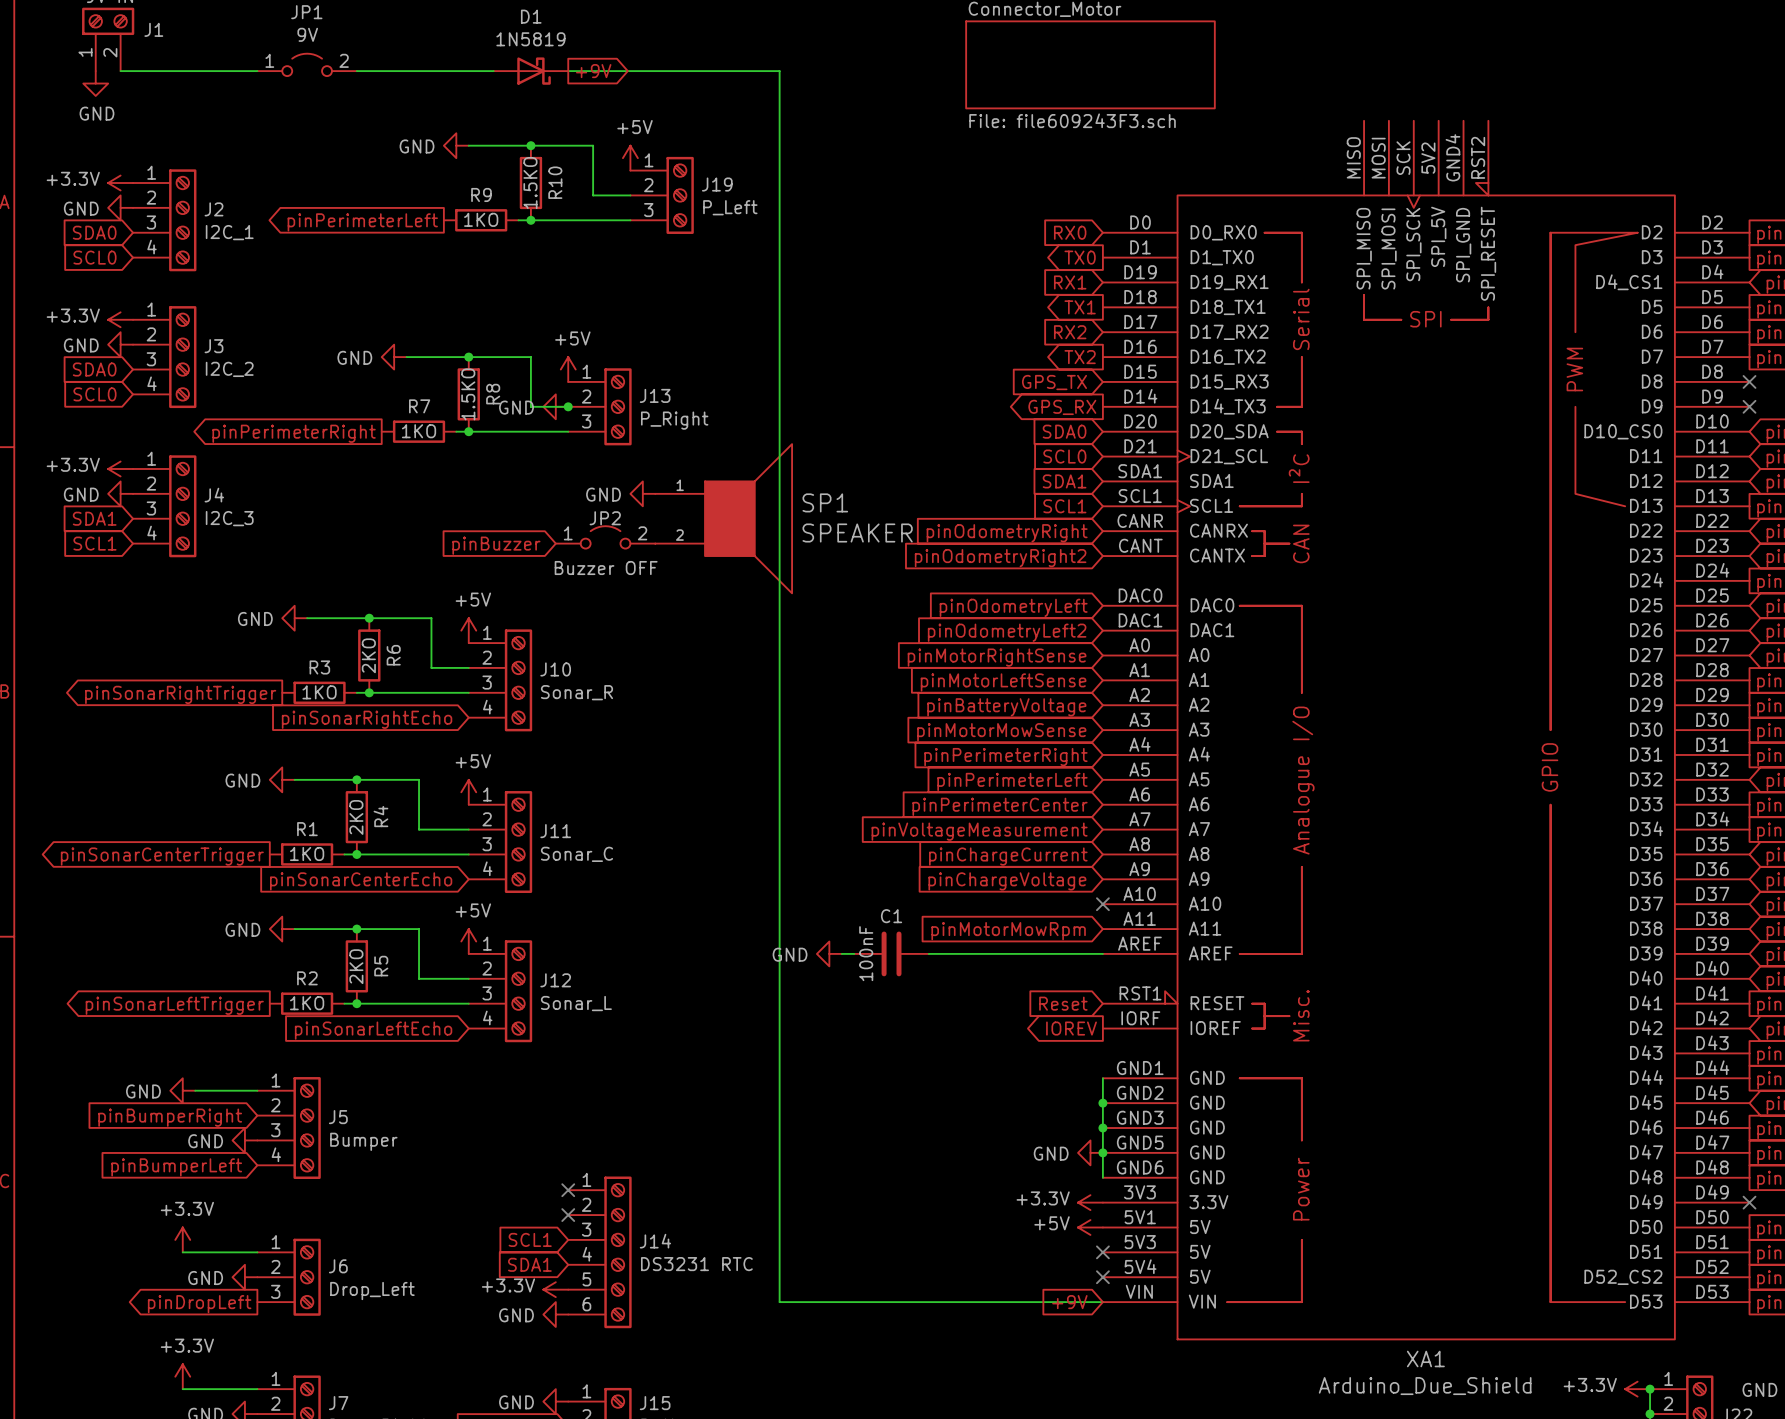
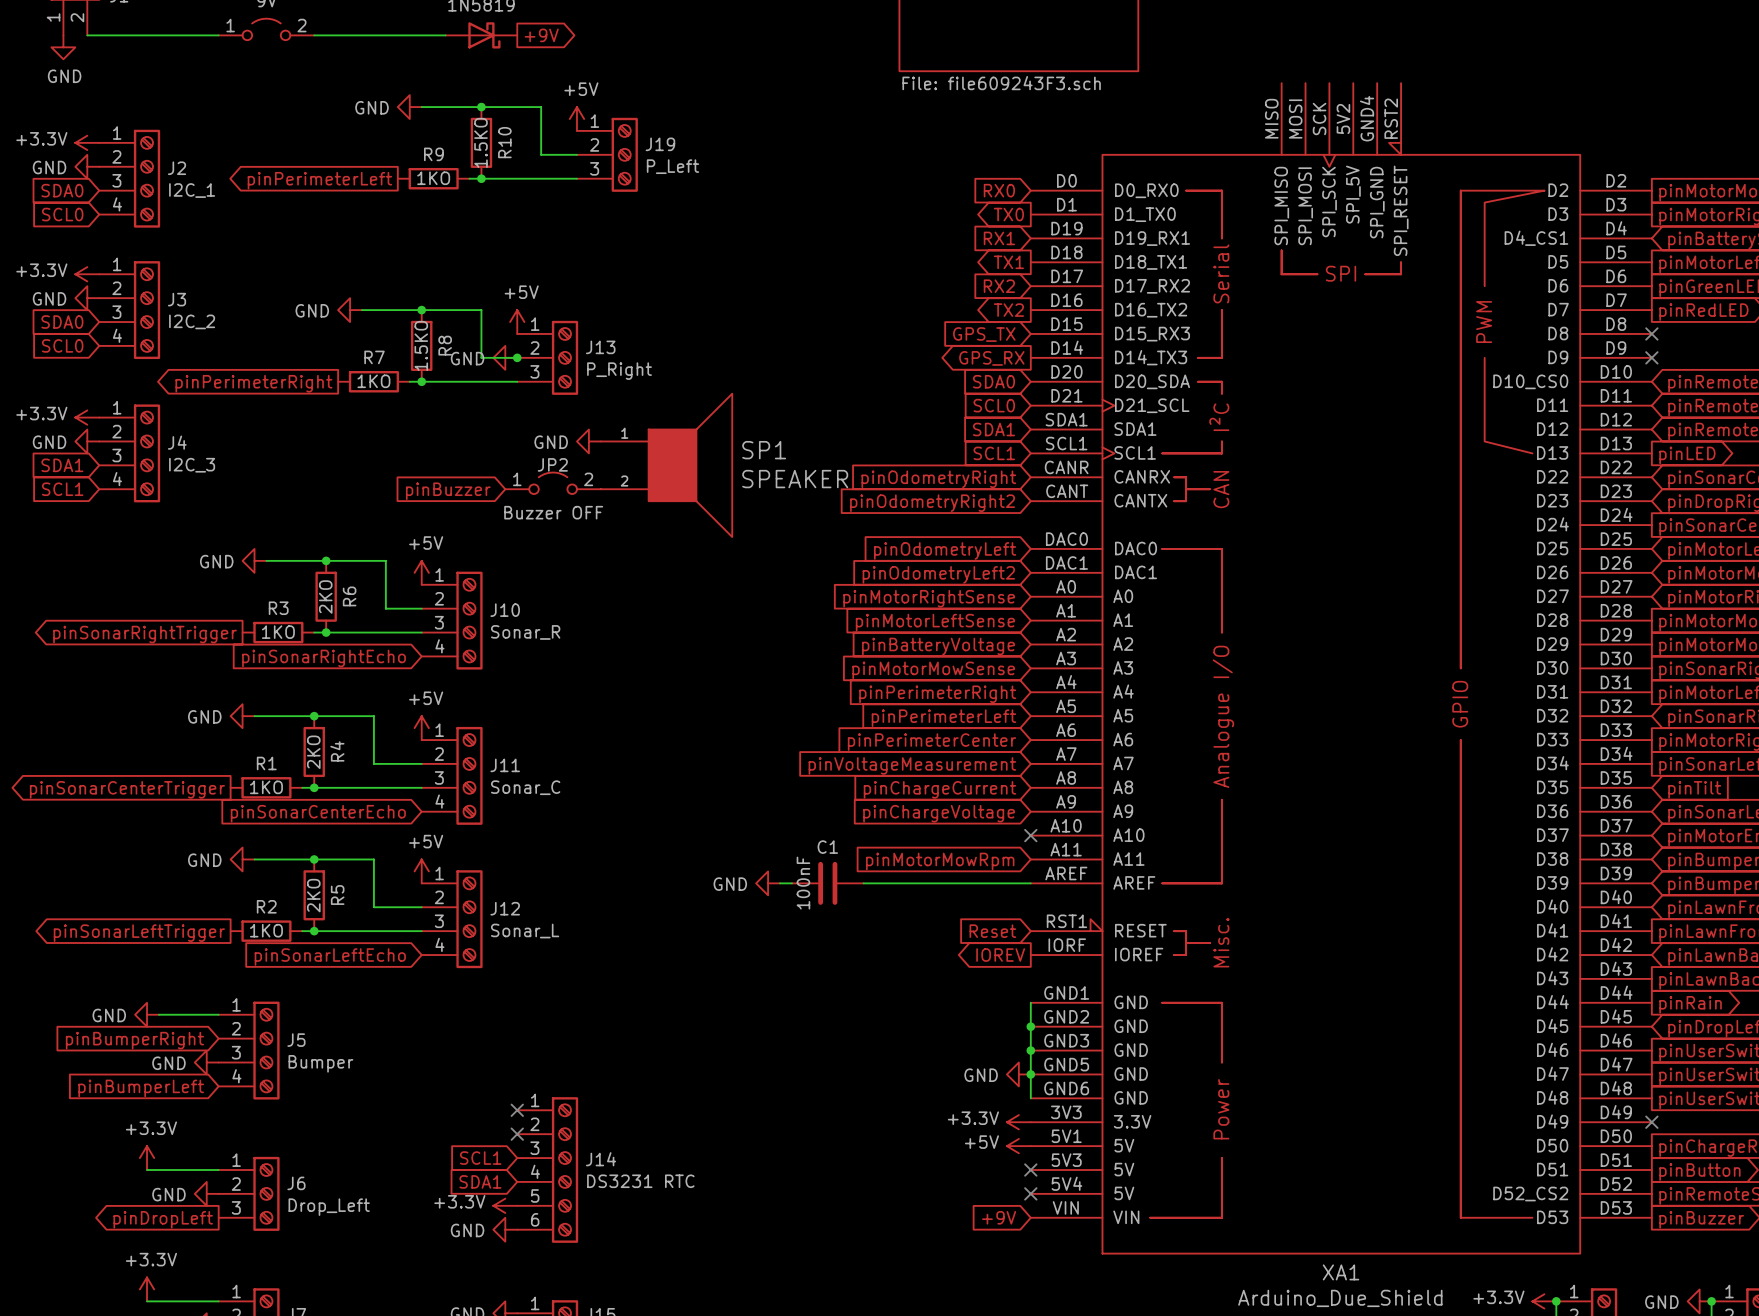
wire: (568, 71) (779, 71) (779, 1302) (1102, 1302) -> none

